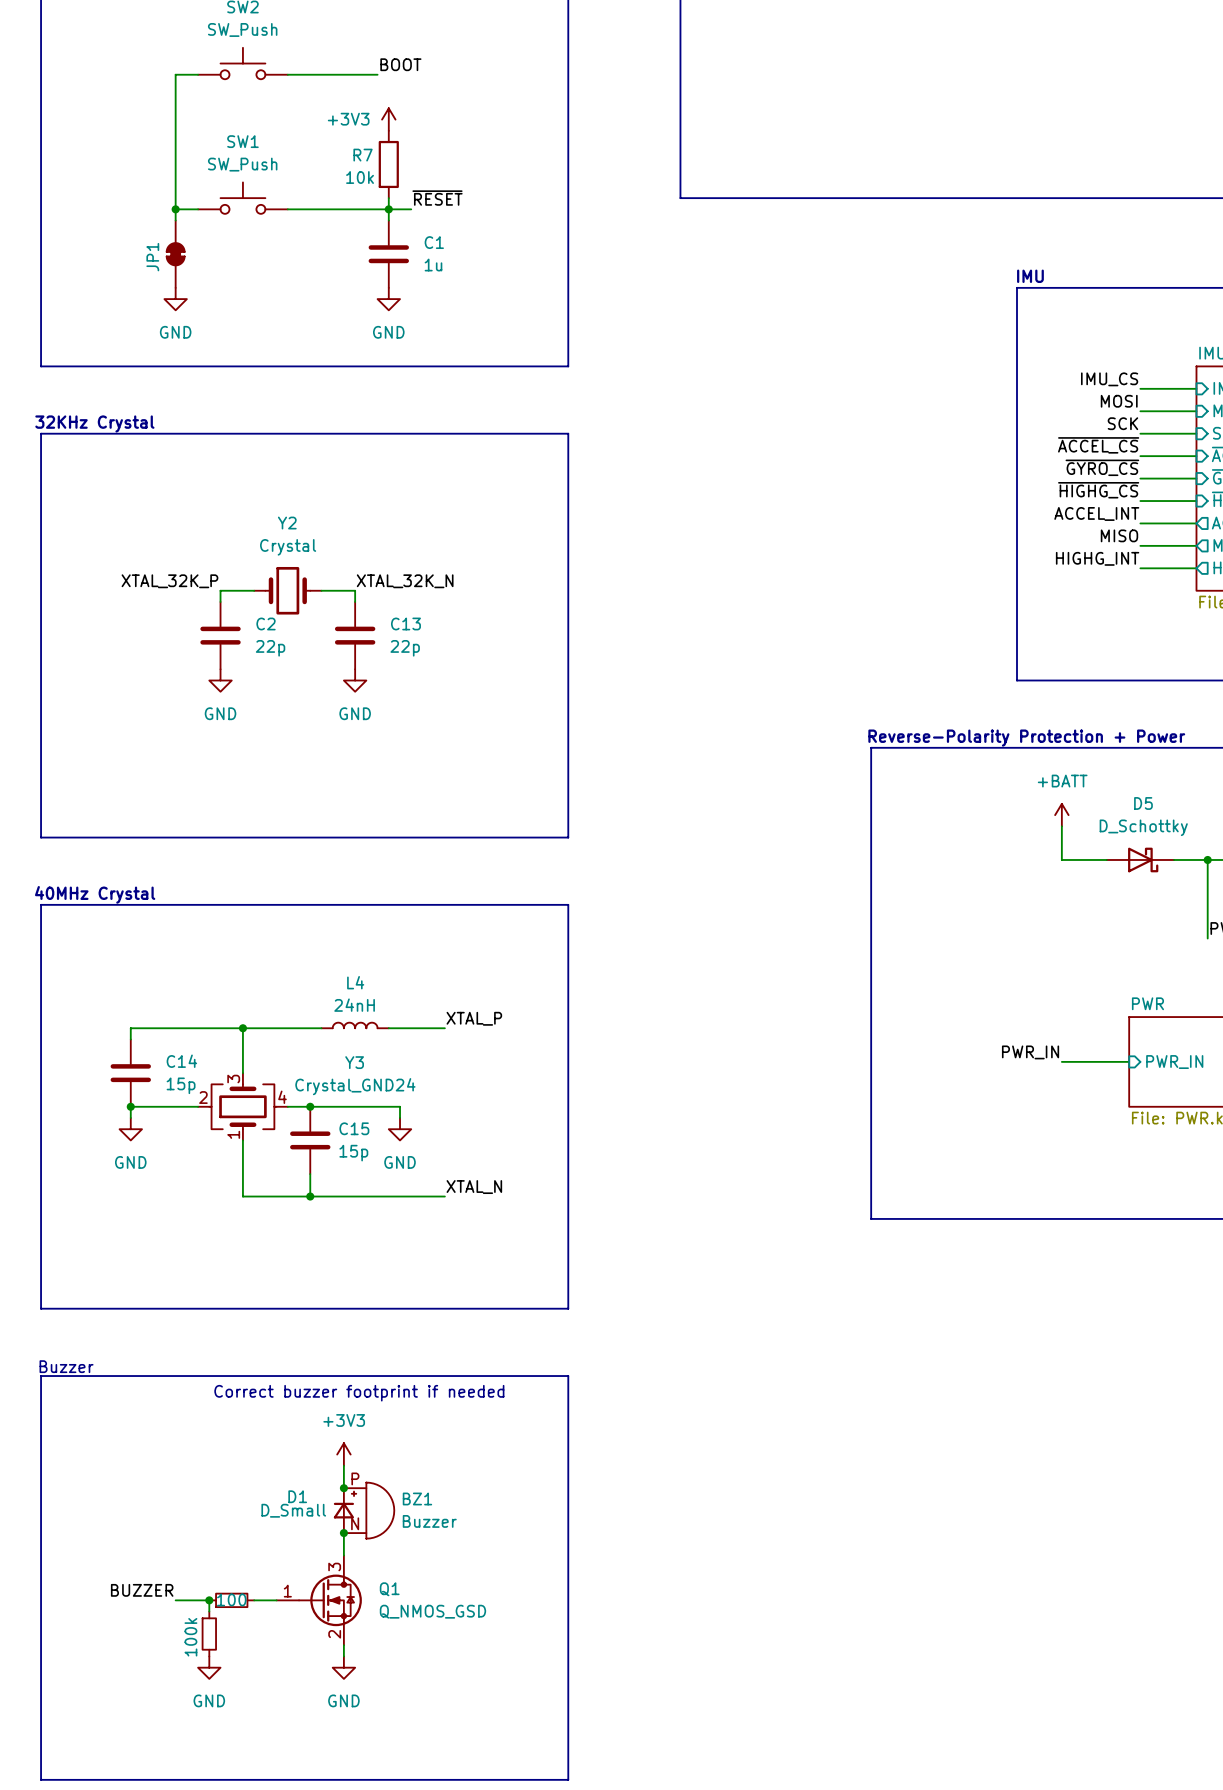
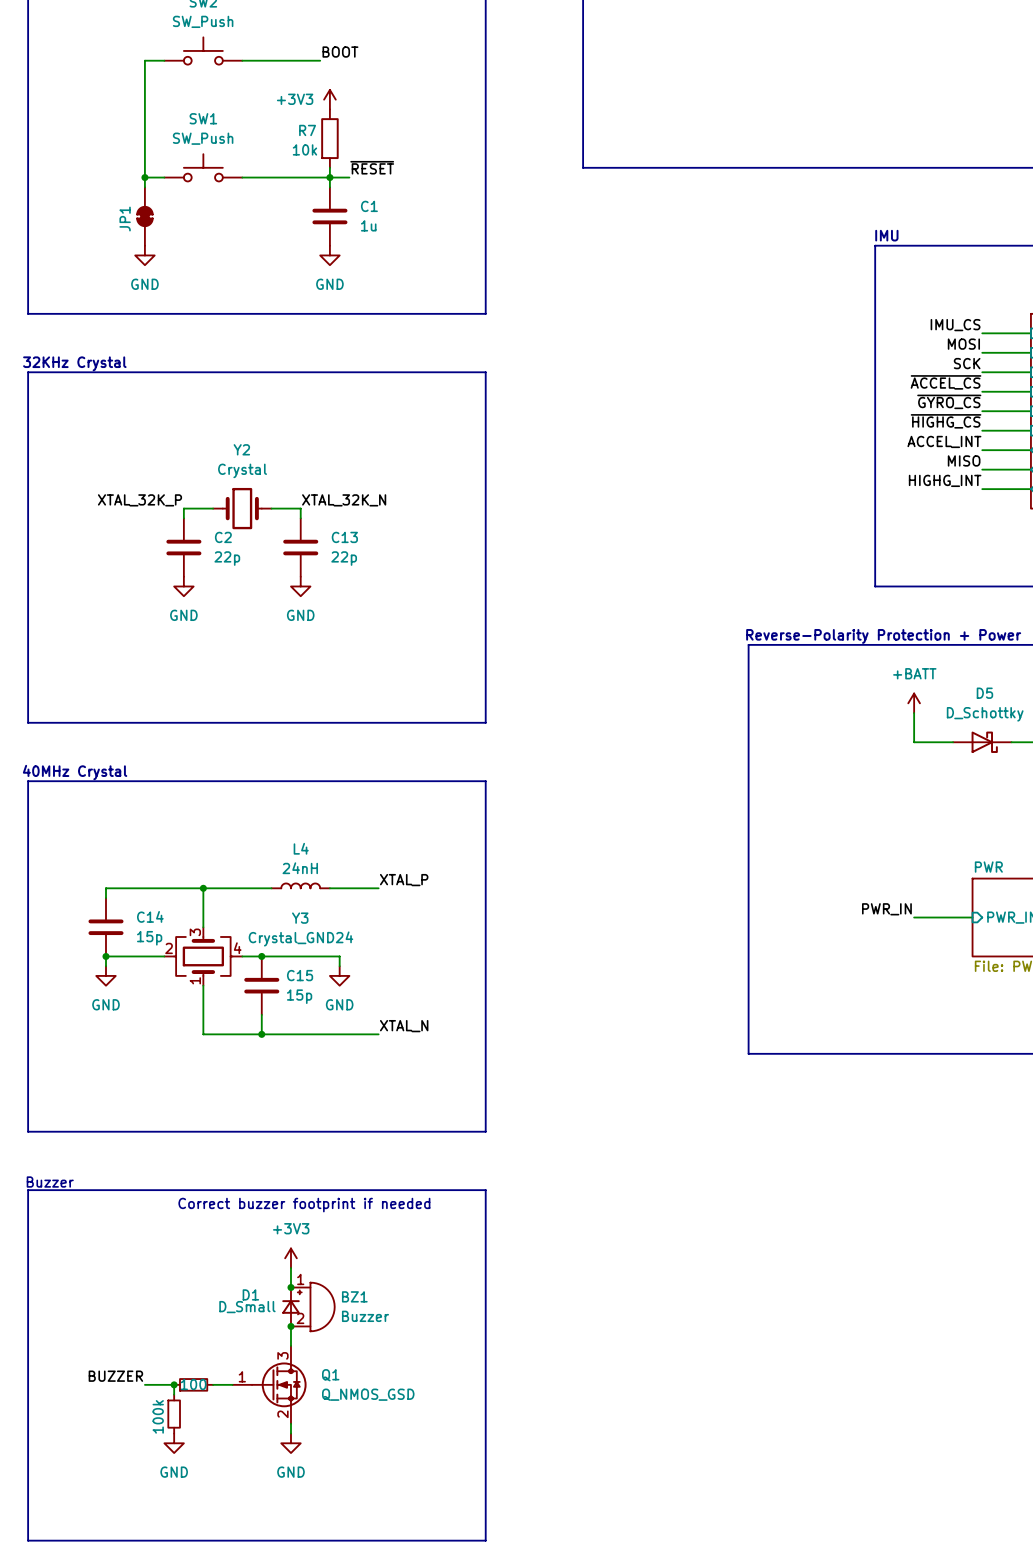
BZ1 pin number: P (355, 1478) -> 1 (300, 1279)
BZ1 pin number: N (355, 1523) -> 2 (300, 1318)

